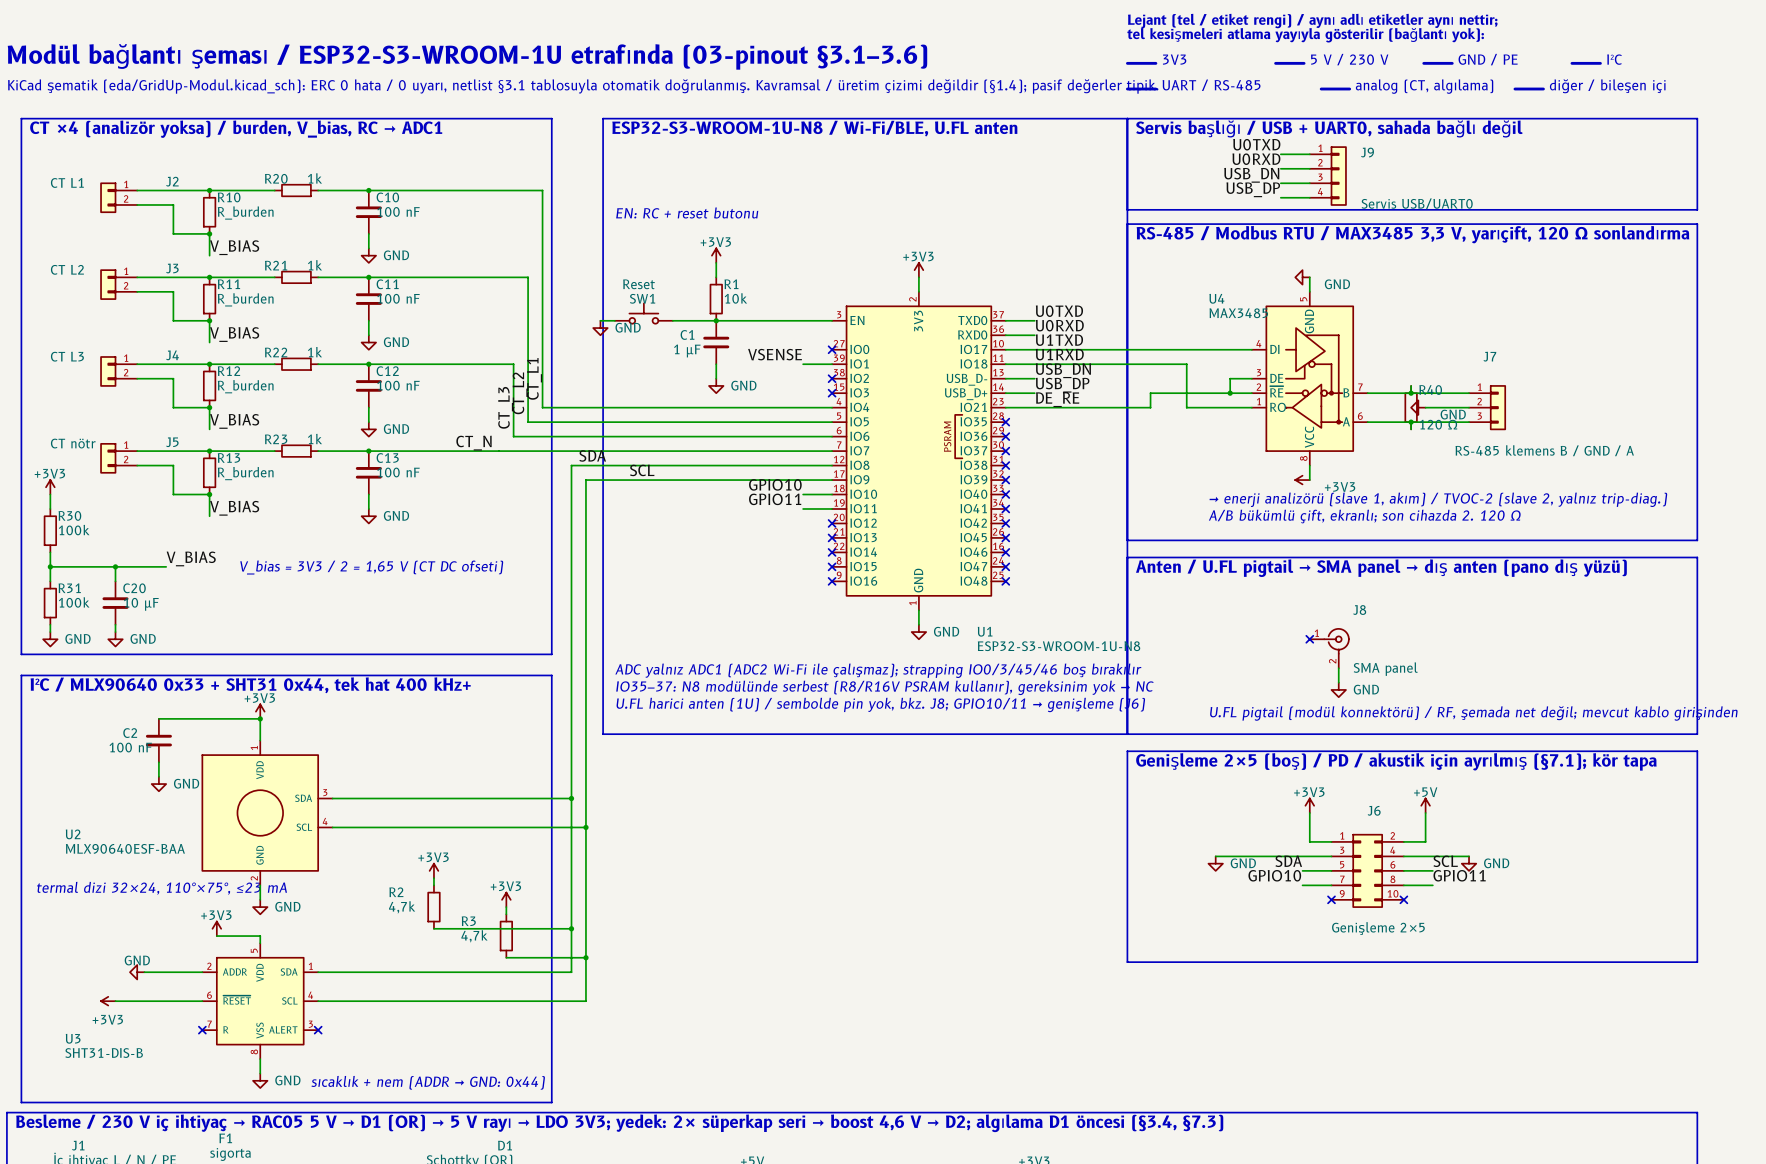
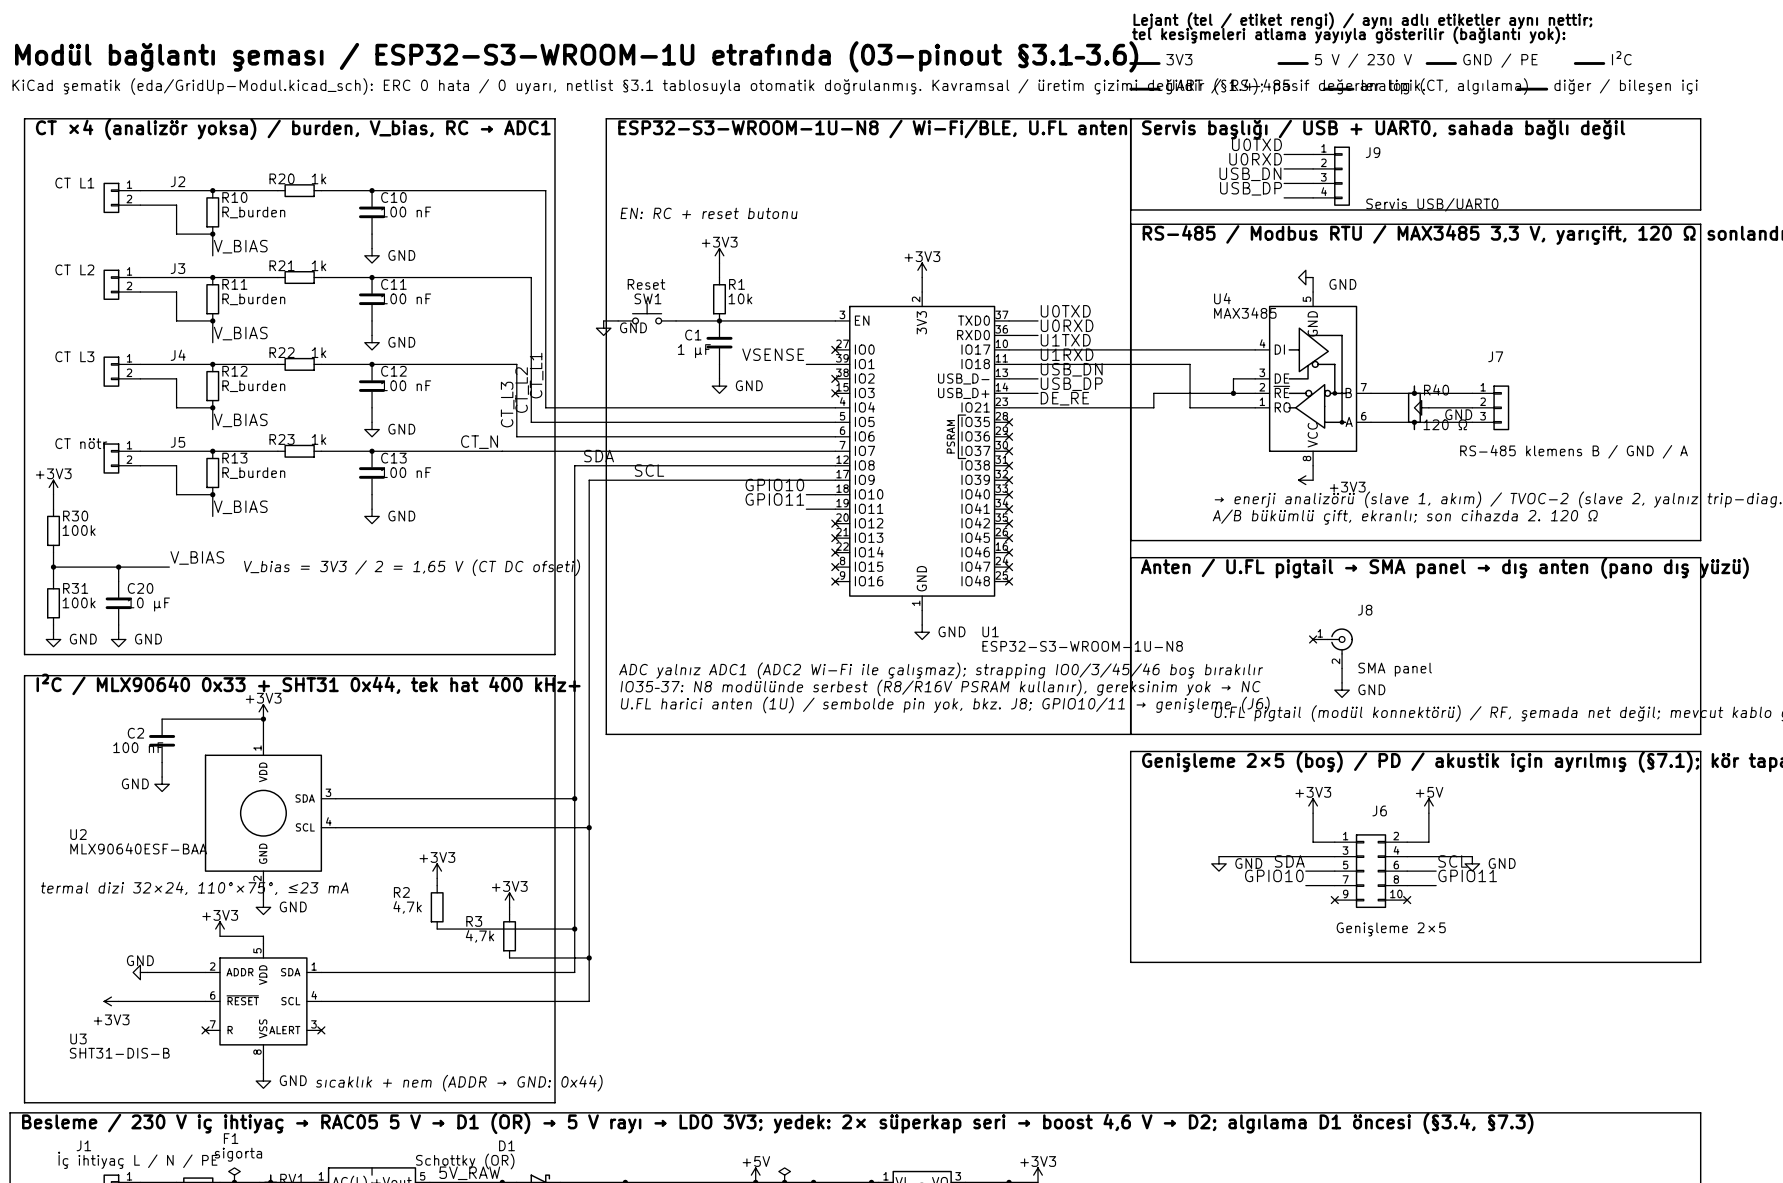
power symbol text position: GND (186, 783) -> GND (135, 783)

